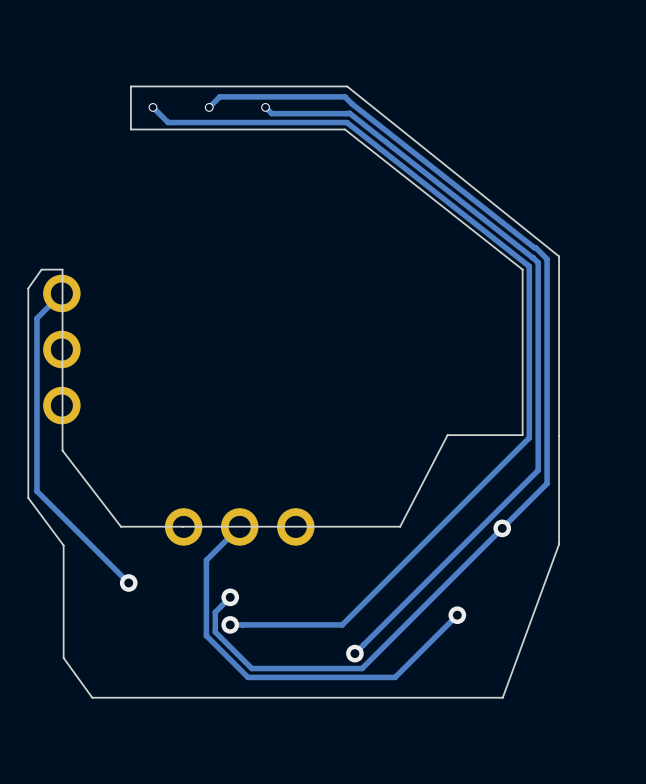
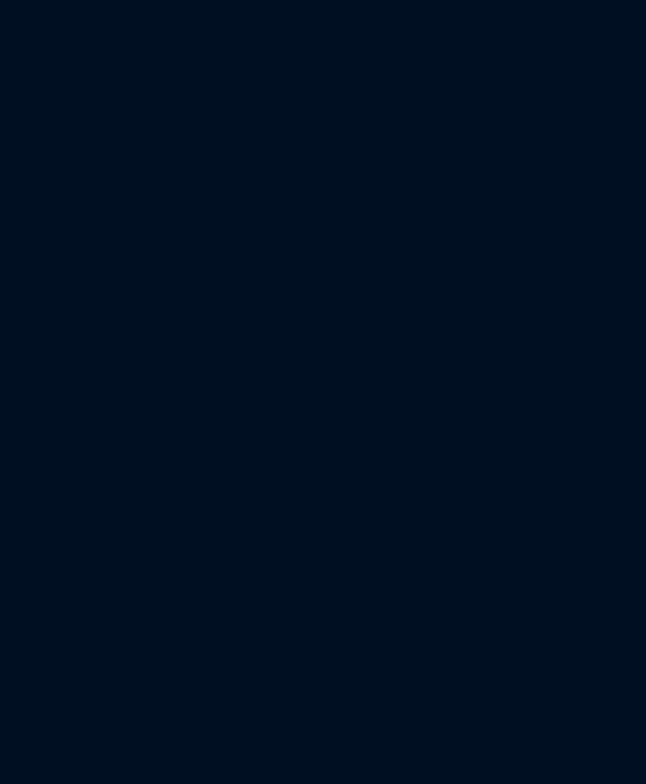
board edge: (347, 86) (559, 256) (559, 544) (502, 697) (92, 697) (63, 658) (63, 545) (28, 498) (28, 288) (41, 269) (62, 269) (62, 450) (121, 526) (400, 526) (447, 435) (522, 435) (522, 269) (344, 129) (130, 129) (130, 86) (347, 86) -> none
track: (153, 107) (168, 122) (346, 122) (529, 266) (529, 437) (342, 624) (230, 624) -> none
via: (153, 107) -> none
track: (209, 107) (219, 96) (345, 96) (535, 247) (547, 259) (547, 483) (362, 668) (251, 668) (215, 632) (215, 612) (230, 597) -> none
via: (209, 107) -> none
track: (265, 107) (271, 113) (349, 113) (538, 262) (538, 470) (354, 653) -> none
via: (265, 107) -> none
track: (55, 293) (55, 299) (36, 318) (36, 491) (128, 582) -> none
part: (61, 349) -> none
part: (239, 526) -> none
via: (502, 528) -> none
track: (239, 533) (233, 533) (206, 560) (206, 635) (248, 677) (395, 677) (457, 615) -> none
via: (128, 582) -> none
via: (230, 597) -> none
via: (457, 615) -> none
via: (230, 624) -> none
via: (354, 653) -> none

